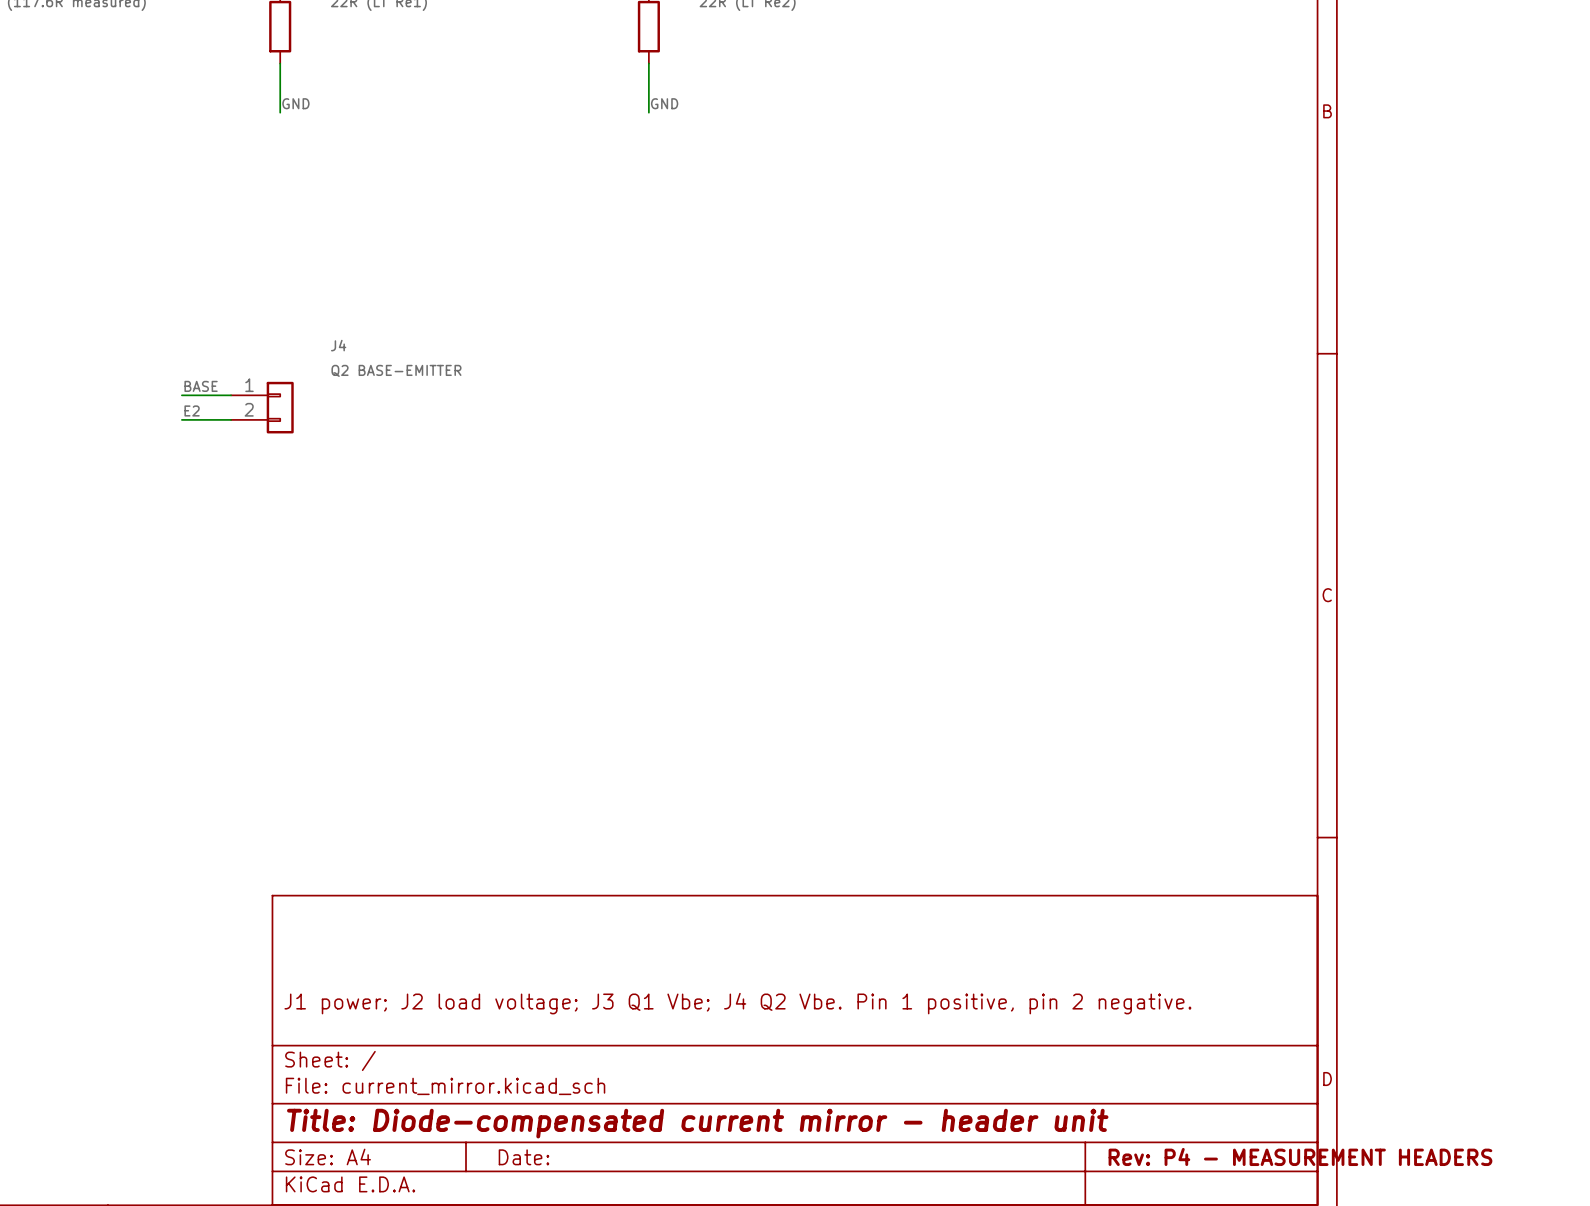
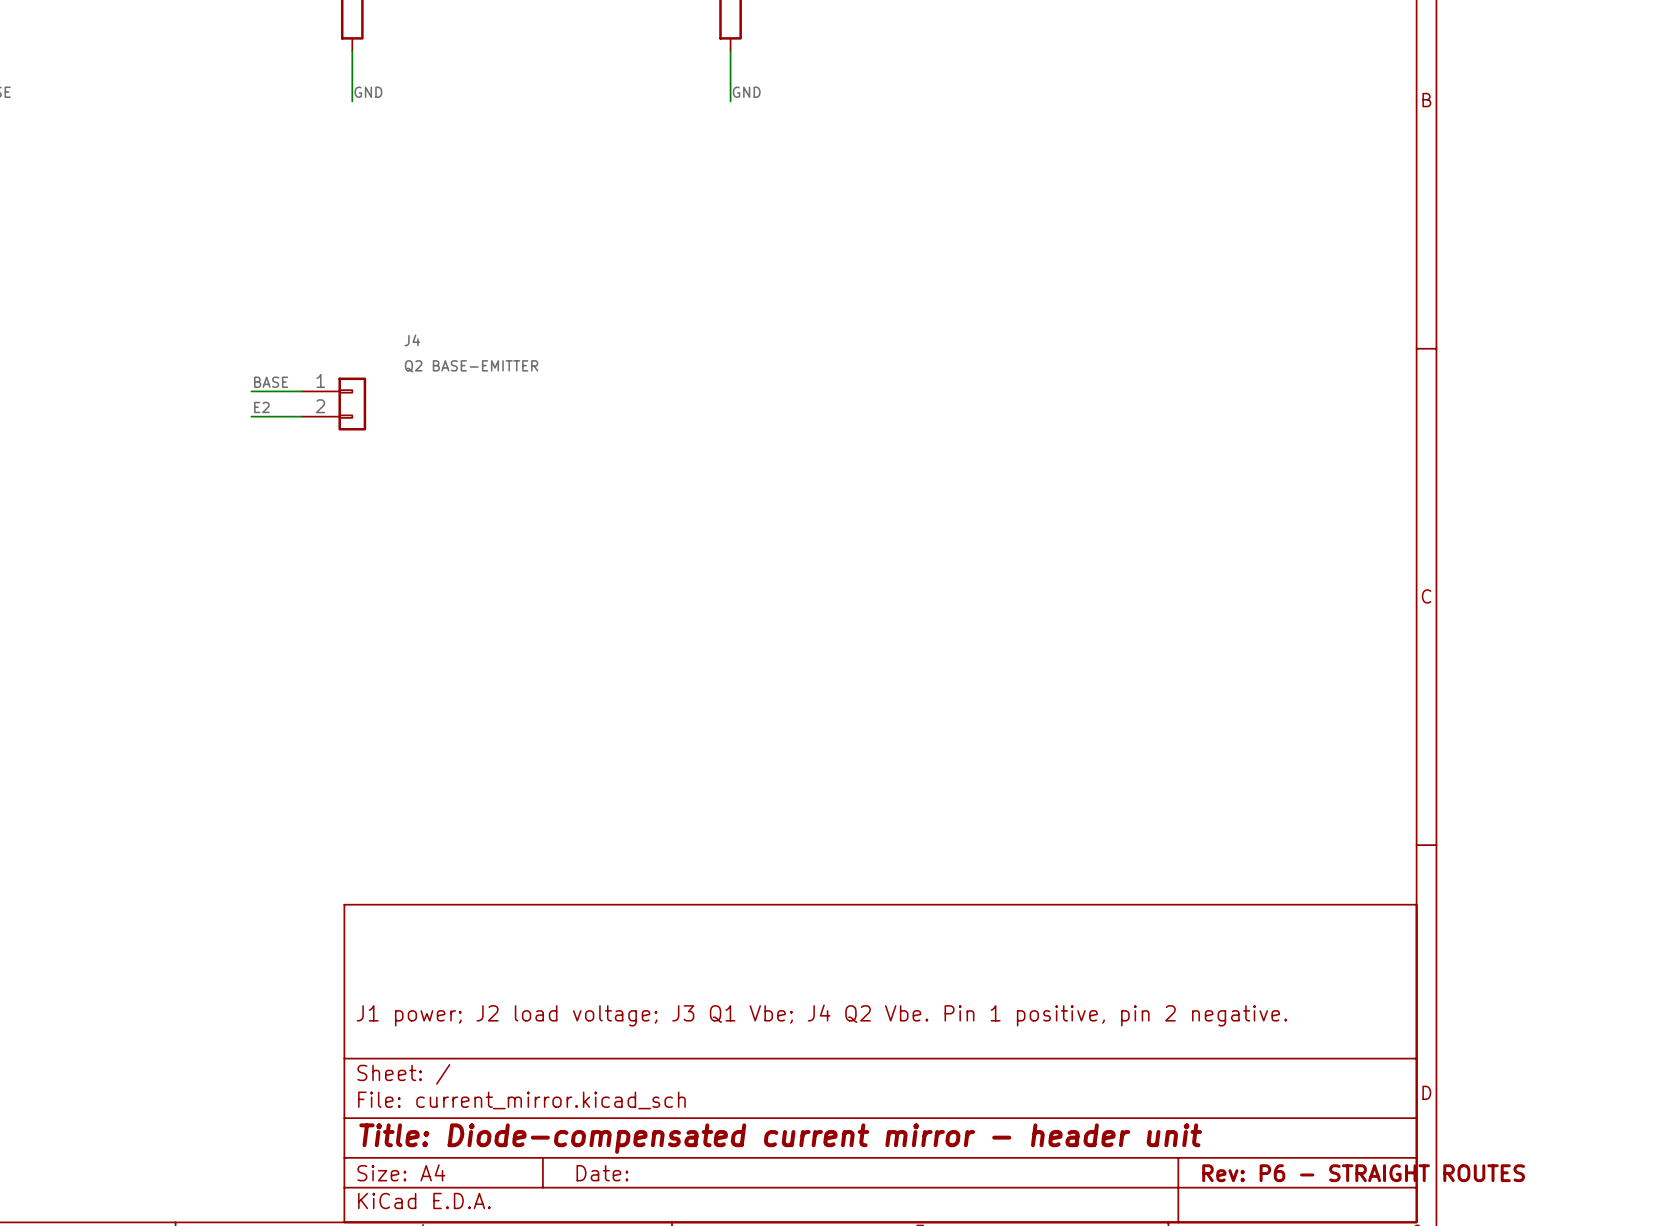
title block: Rev: P4 - MEASUREMENT HEADERS (1300, 1156) -> Rev: P6 - STRAIGHT ROUTES (1363, 1173)

